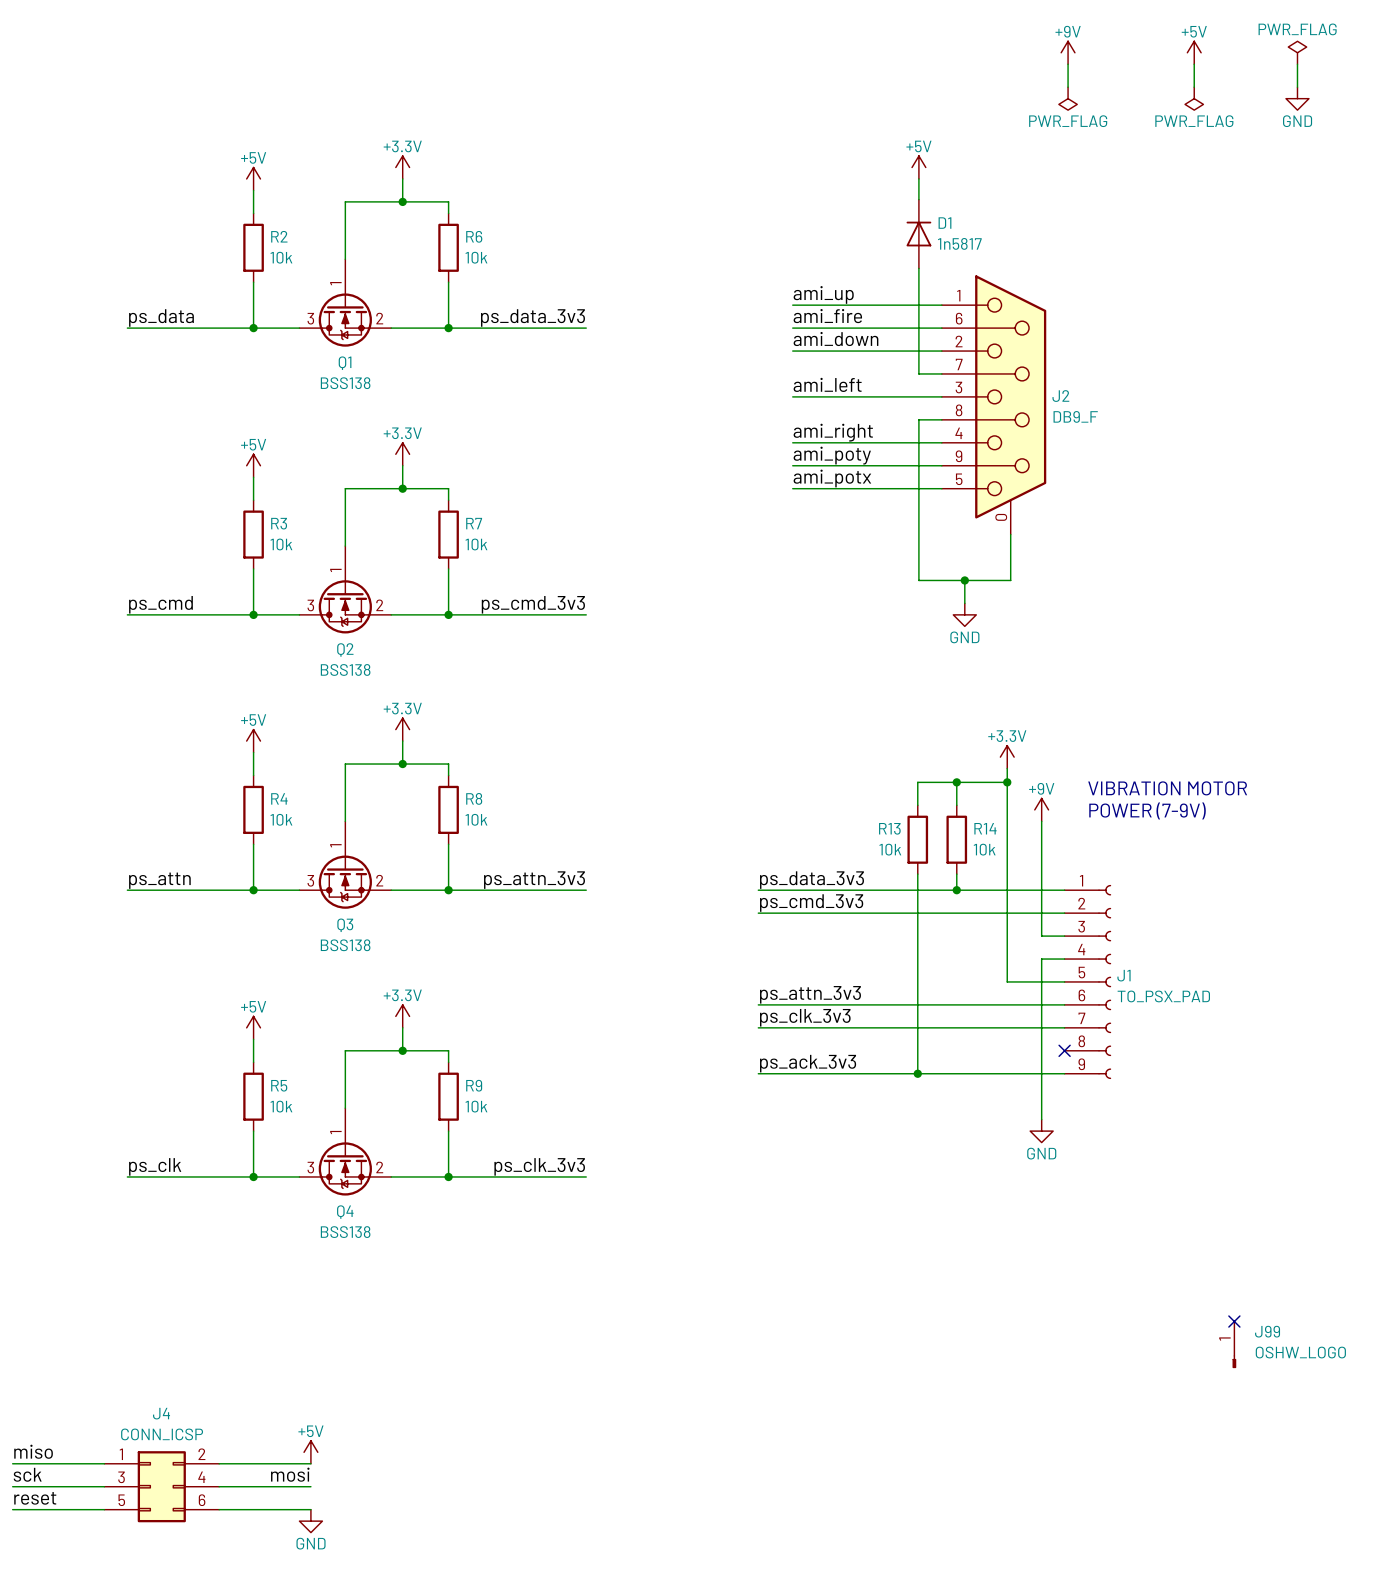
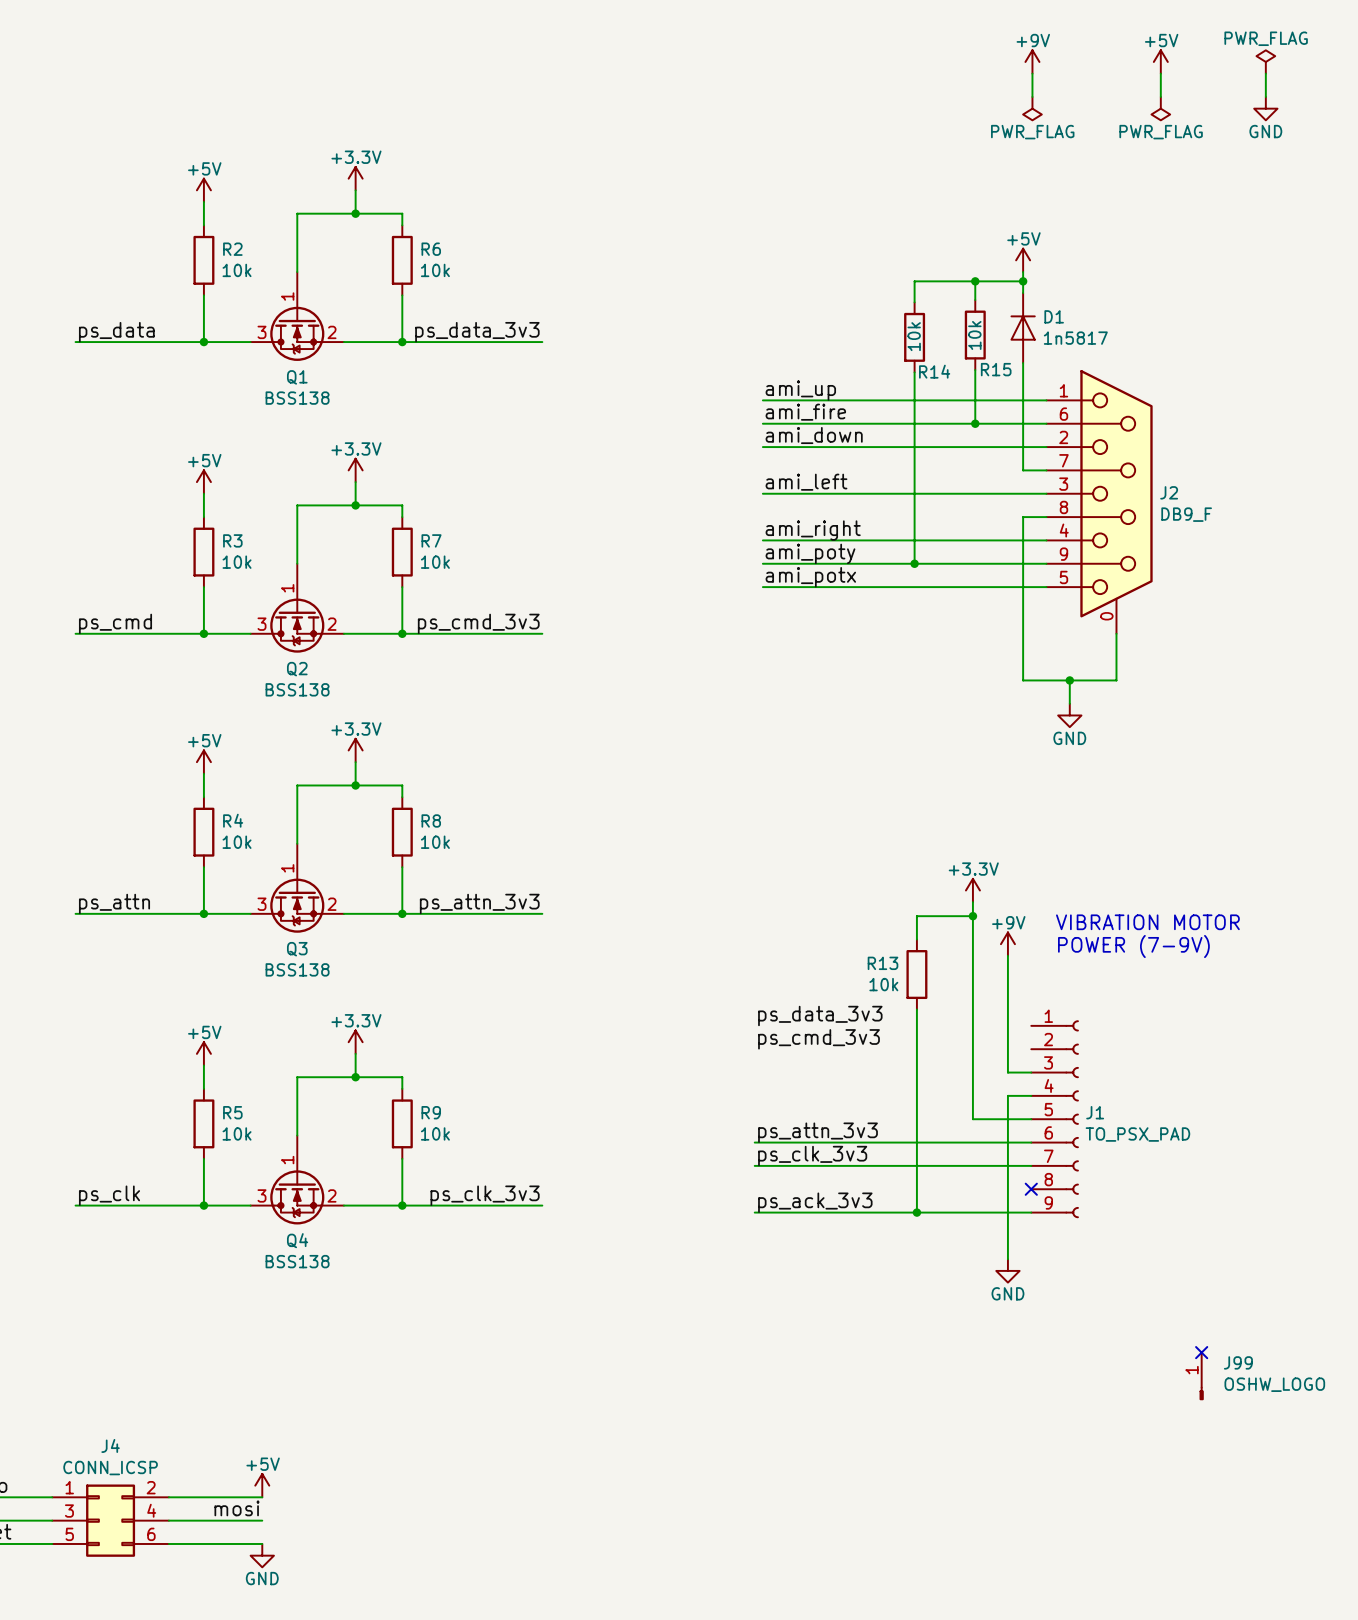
power symbol position: +5V (918, 167) -> +5V (1023, 260)
wire: (918, 178) (918, 199) -> (1023, 272) (1023, 293)
D1 position: (918, 234) -> (1023, 328)
wire: (918, 268) (918, 373) (941, 373) -> (1023, 363) (1023, 470) (1046, 470)
wire: none -> (975, 281) (975, 300)
junction: none -> (975, 281)
wire: none -> (1023, 281) (914, 281) (914, 302)
junction: none -> (1023, 281)
label position: ami_up (823, 294) -> ami_up (800, 390)
wire: (792, 305) (941, 305) -> none
label position: ami_fire (827, 316) -> ami_fire (805, 412)
R15: none -> 10k (975, 335)
wire: (792, 328) (941, 328) -> none
label position: ami_down (836, 339) -> ami_down (814, 435)
wire: (792, 351) (941, 351) -> none
wire: none -> (914, 372) (914, 563)
label position: ami_left (827, 384) -> ami_left (806, 482)
wire: none -> (762, 400) (1046, 400)
wire: (792, 396) (941, 396) -> none
J2 position: (994, 404) -> (1099, 501)
wire: none -> (762, 423) (1046, 423)
junction: none -> (975, 423)
wire: (941, 419) (918, 419) (918, 580) (1010, 580) (1010, 534) -> (1046, 517) (1023, 517) (1023, 680) (1116, 680) (1116, 633)
wire: none -> (762, 447) (1046, 447)
label position: ami_right (833, 432) -> ami_right (813, 530)
wire: (792, 442) (941, 442) -> none
label position: ami_poty (832, 455) -> ami_poty (810, 553)
wire: (792, 465) (941, 465) -> none
wire: none -> (762, 493) (1046, 493)
label position: ami_potx (832, 478) -> ami_potx (810, 577)
wire: (792, 488) (941, 488) -> none
wire: none -> (762, 540) (1046, 540)
wire: none -> (762, 563) (1046, 563)
wire: none -> (762, 587) (1046, 587)
wire: (964, 580) (964, 603) -> (1069, 680) (1069, 703)
junction position: (964, 580) -> (914, 563)
power symbol position: GND (964, 614) -> GND (1069, 715)
junction: none -> (1069, 680)
power symbol position: +3.3V (1007, 757) -> +3.3V (972, 890)
wire: (1007, 768) (1007, 981) (1064, 981) -> (972, 902) (972, 1119) (1031, 1119)
wire: (956, 782) (956, 805) -> none
junction: (956, 782) -> none
wire: (1007, 782) (917, 782) (917, 805) -> none
junction: (1007, 782) -> none
text position: VIBRATION MOTOR (1167, 788) -> VIBRATION MOTOR (1147, 922)
power symbol position: +9V (1041, 809) -> +9V (1007, 944)
text position: POWER (7-9V) (1147, 810) -> POWER (7-9V) (1133, 946)
wire: (1041, 821) (1041, 936) (1064, 936) -> (1007, 955) (1007, 1072) (1031, 1072)
R14 name position: R14 (985, 828) -> R14 (934, 371)
R13 position: (917, 839) -> (916, 974)
R14 position: (956, 839) -> (914, 337)
R14 value rotation: 0° (984, 849) -> 90° counterclockwise (914, 336)
wire: (917, 874) (917, 1073) -> (916, 1009) (916, 1212)
wire: (956, 874) (956, 890) -> none
label position: ps_data_3v3 (812, 880) -> ps_data_3v3 (820, 1015)
wire: (758, 890) (1064, 890) -> none
junction position: (956, 890) -> (972, 916)
wire: none -> (972, 916) (916, 916) (916, 939)
label position: ps_cmd_3v3 (811, 903) -> ps_cmd_3v3 (819, 1039)
wire: (758, 913) (1064, 913) -> none
wire: (1064, 959) (1041, 959) (1041, 1119) -> (1031, 1095) (1007, 1095) (1007, 1259)
J1 position: (1087, 981) -> (1054, 1119)
label position: ps_attn_3v3 (810, 994) -> ps_attn_3v3 (817, 1132)
wire: (758, 1004) (1064, 1004) -> none
label position: ps_clk_3v3 (805, 1017) -> ps_clk_3v3 (812, 1156)
wire: (758, 1027) (1064, 1027) -> none
no-connect mark: (1064, 1050) -> none
label position: ps_ack_3v3 (808, 1063) -> ps_ack_3v3 (815, 1202)
wire: (758, 1073) (1064, 1073) -> none
junction: (917, 1073) -> none
wire: none -> (754, 1142) (1031, 1142)
power symbol position: GND (1041, 1131) -> GND (1007, 1270)
wire: none -> (754, 1165) (1031, 1165)
no-connect mark: none -> (1031, 1189)
wire: none -> (754, 1212) (1031, 1212)
junction: none -> (916, 1212)

